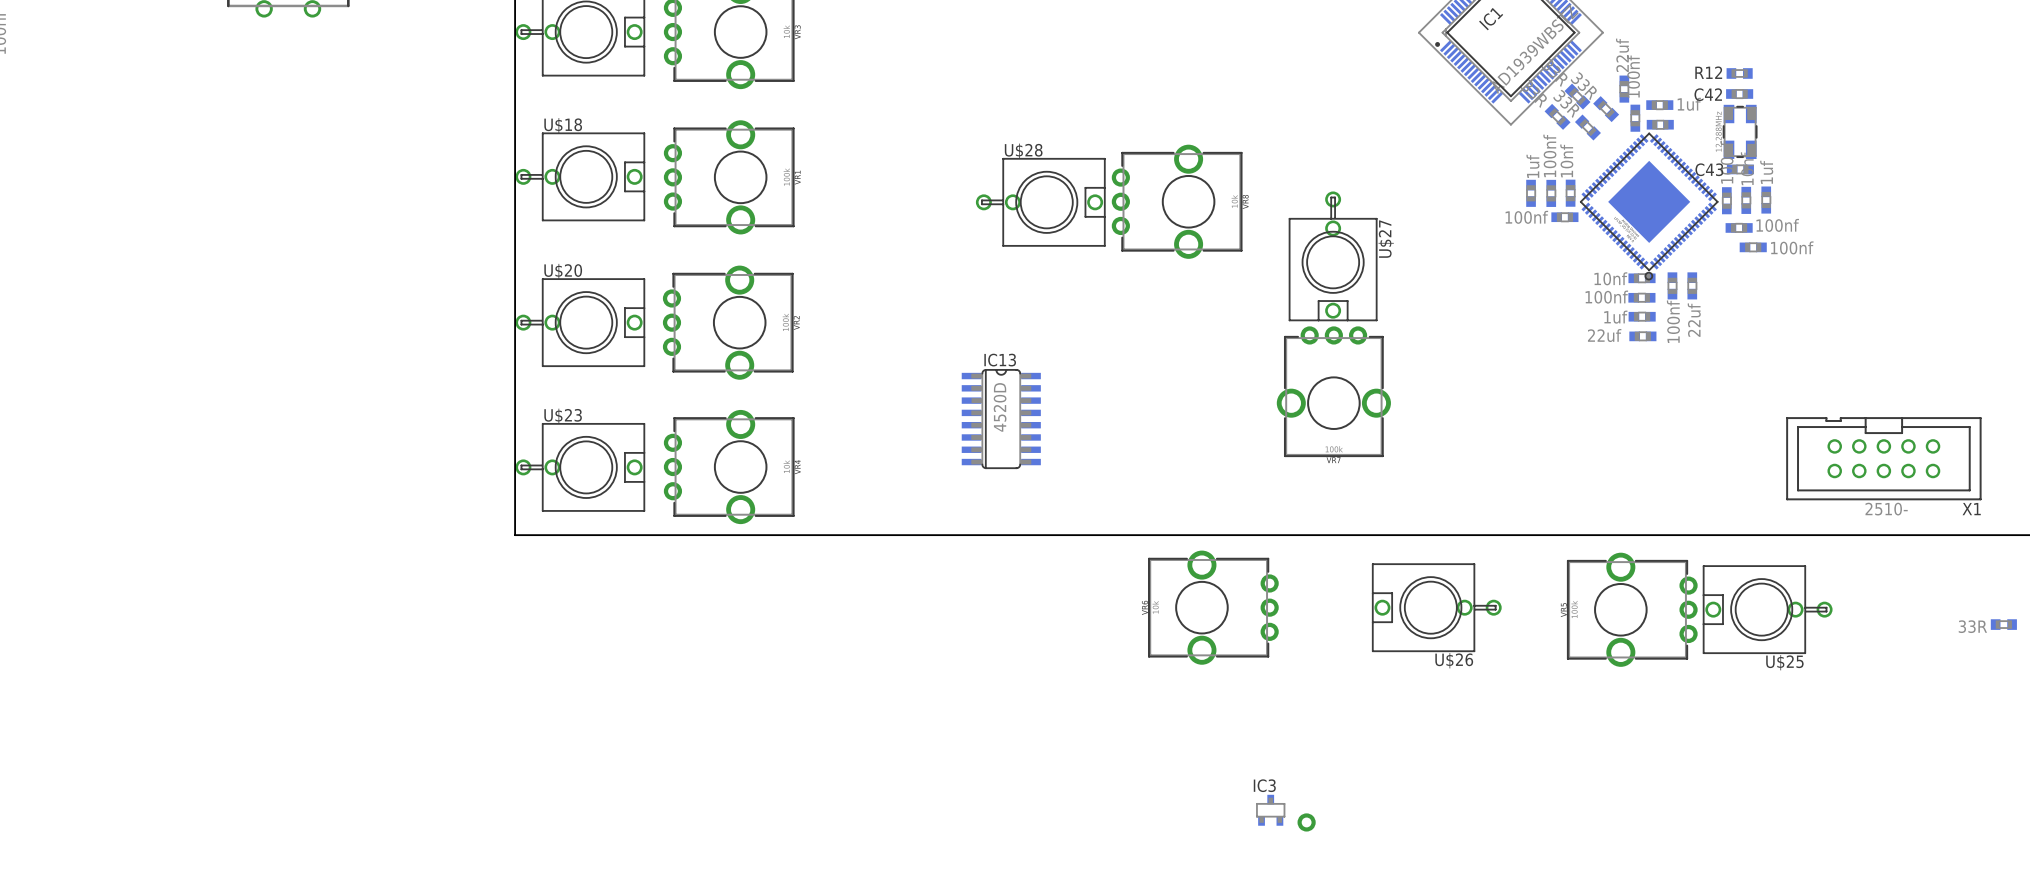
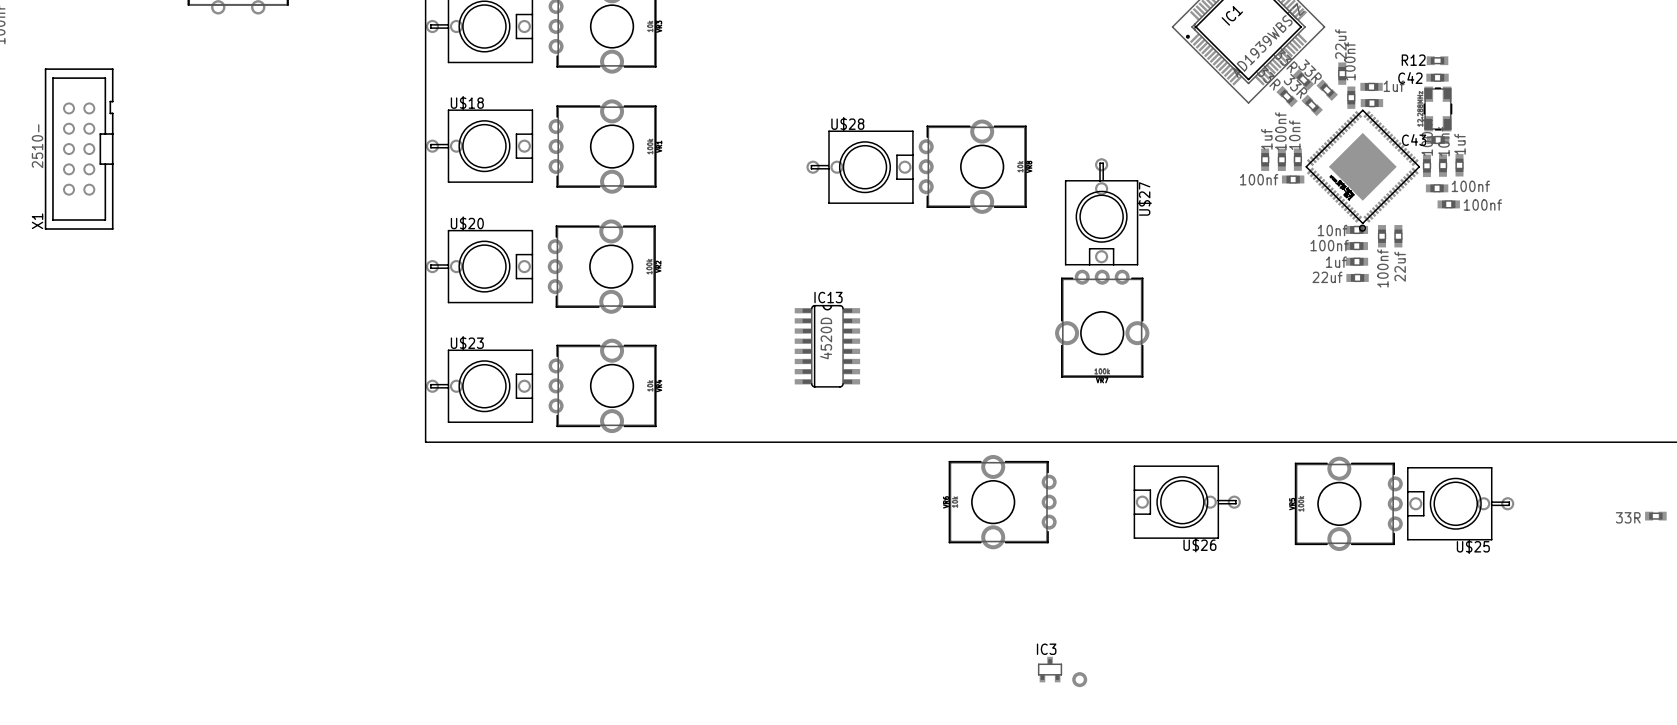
X1 rotation: 0° (1883, 458) -> 90° clockwise (79, 149)
X1 position: (1883, 458) -> (79, 149)

